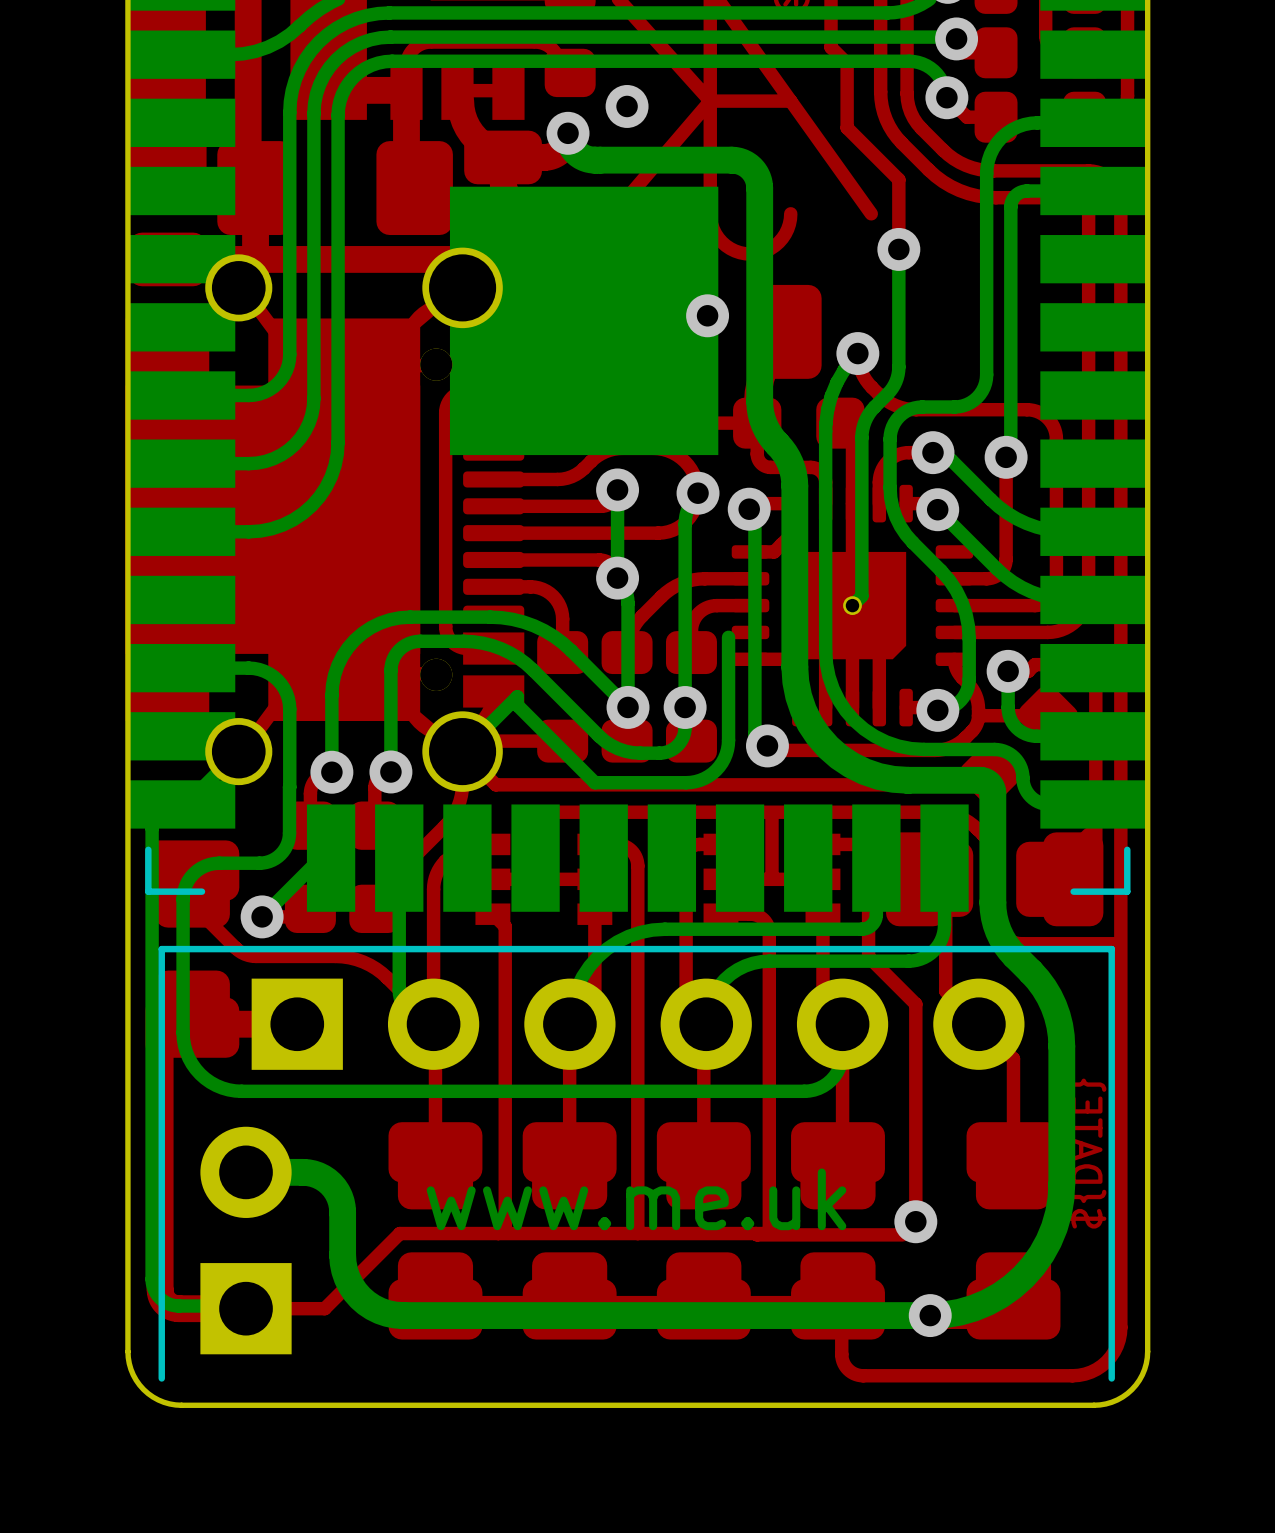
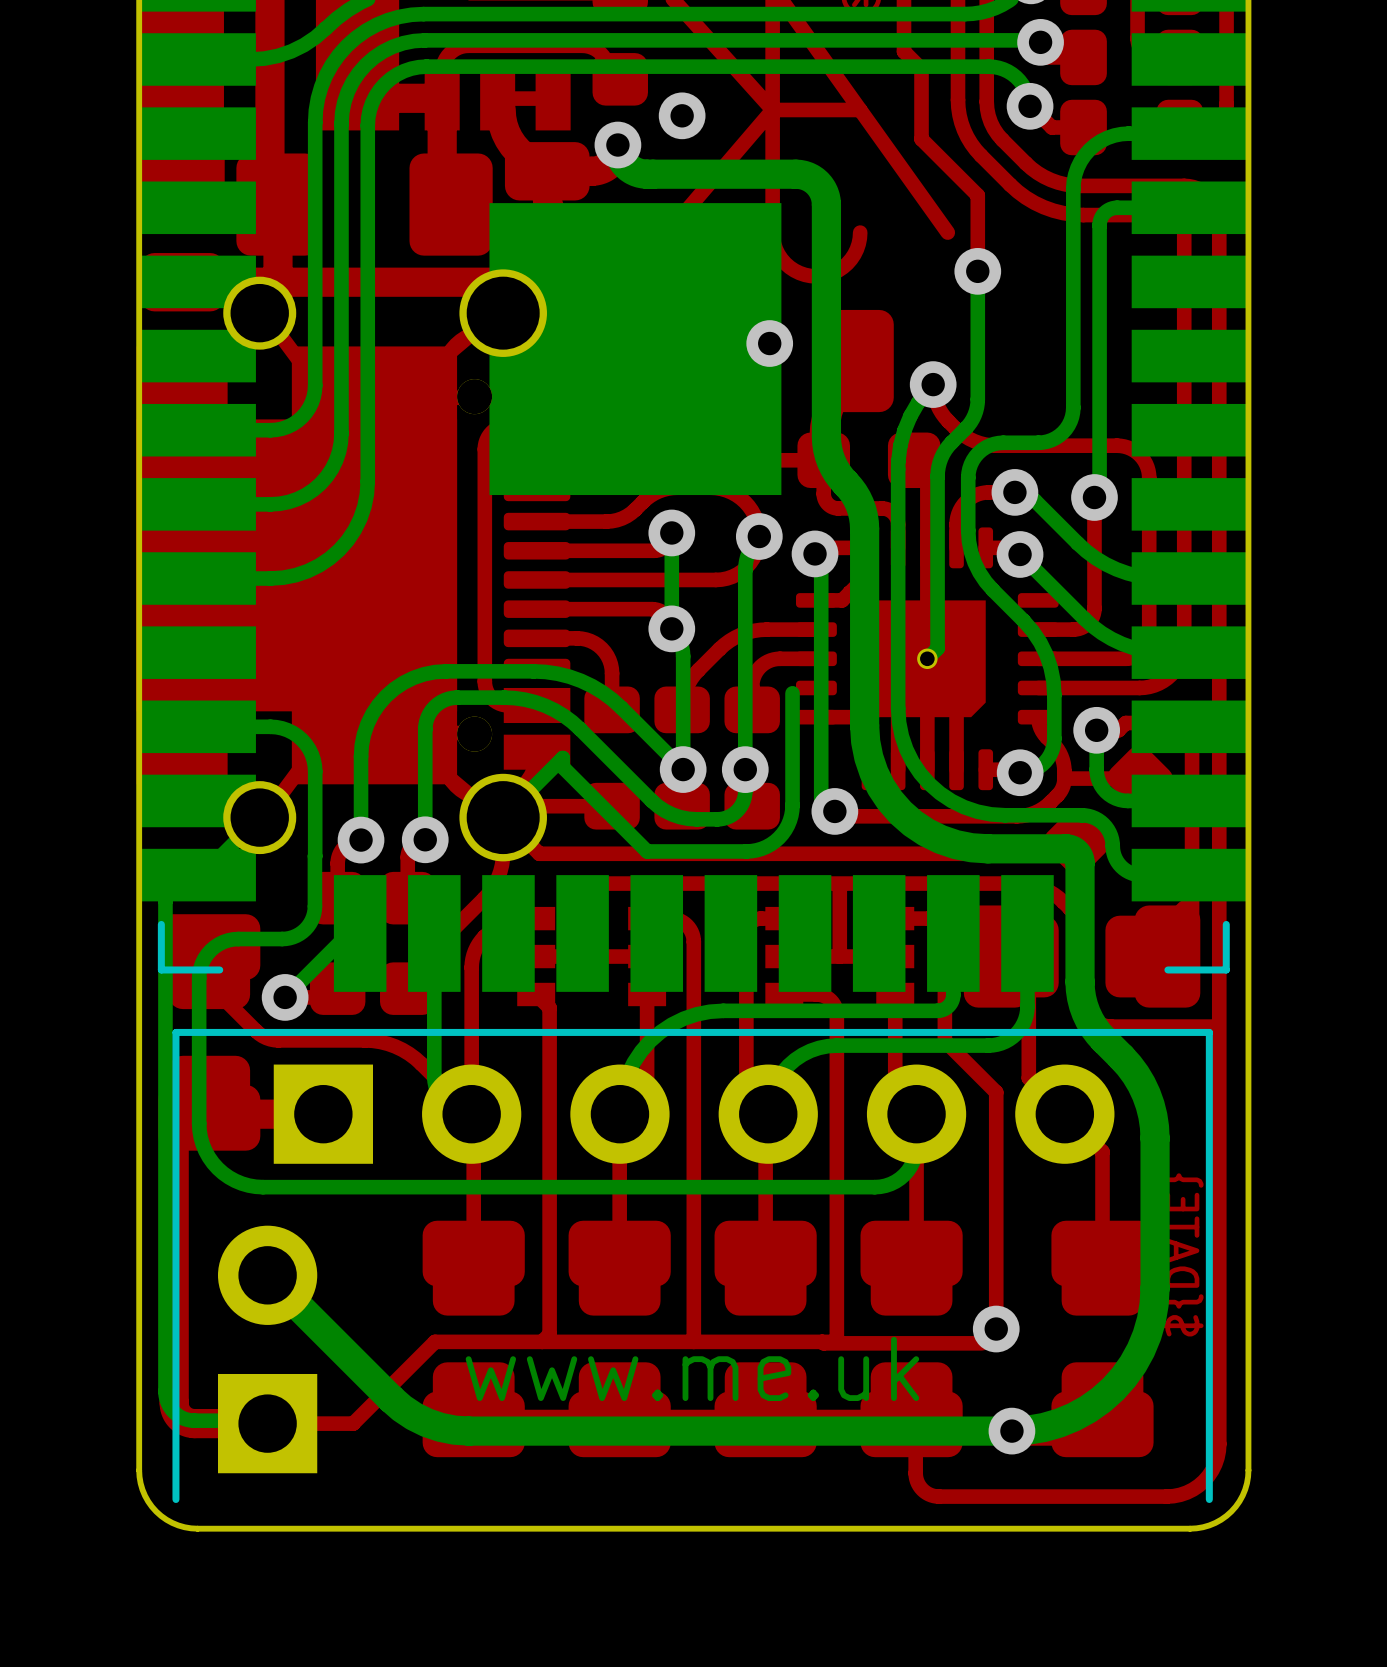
bottom track: (246, 1172) (308, 1172) (327, 1180) (334, 1187) (341, 1201) (343, 1262) (347, 1278) (355, 1291) (366, 1303) (387, 1313) (431, 1315) -> (267, 1275) (401, 1408) (426, 1422) (440, 1427) (469, 1431)
text position: www.me.uk (636, 1199) -> www.me.uk (692, 1368)

